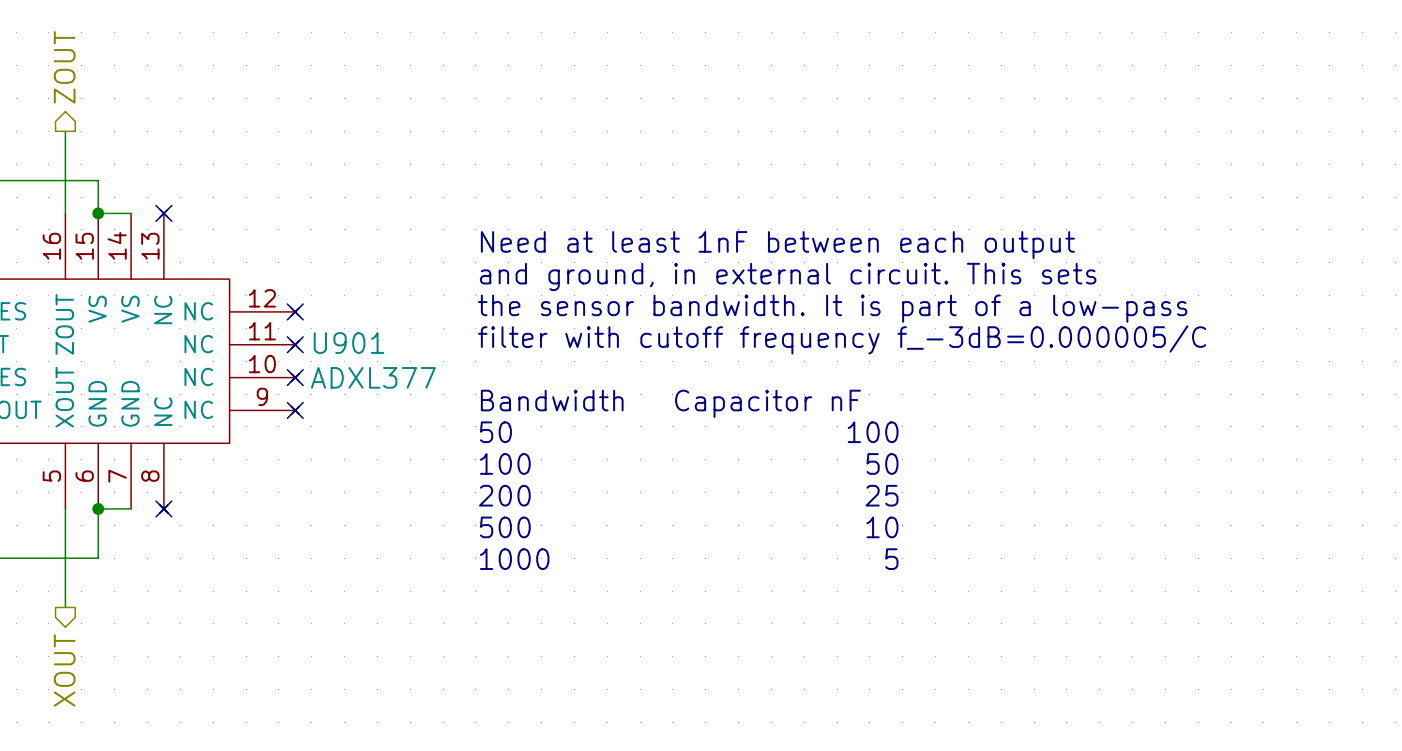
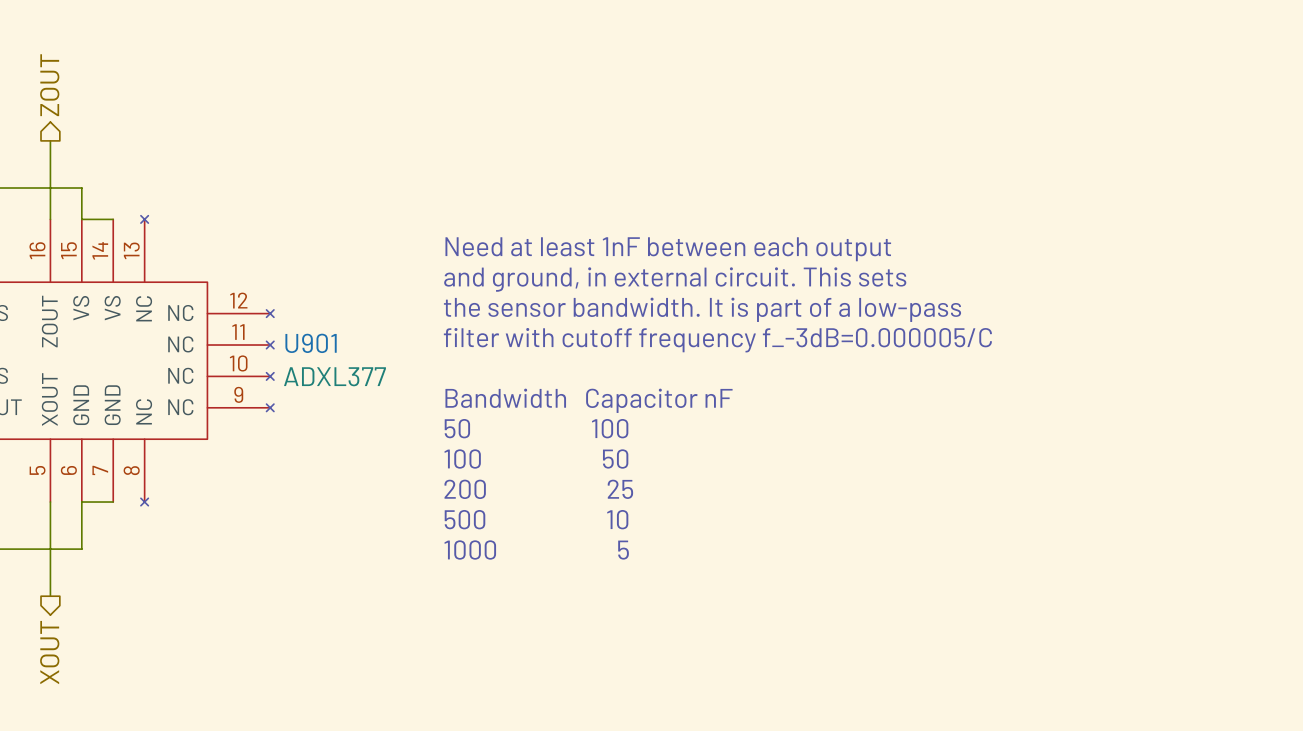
junction: (98, 213) -> none
no-connect mark: (163, 213) -> none
no-connect mark: (295, 311) -> none
no-connect mark: (295, 344) -> none
no-connect mark: (295, 377) -> none
no-connect mark: (295, 410) -> none
junction: (98, 508) -> none
no-connect mark: (163, 508) -> none

